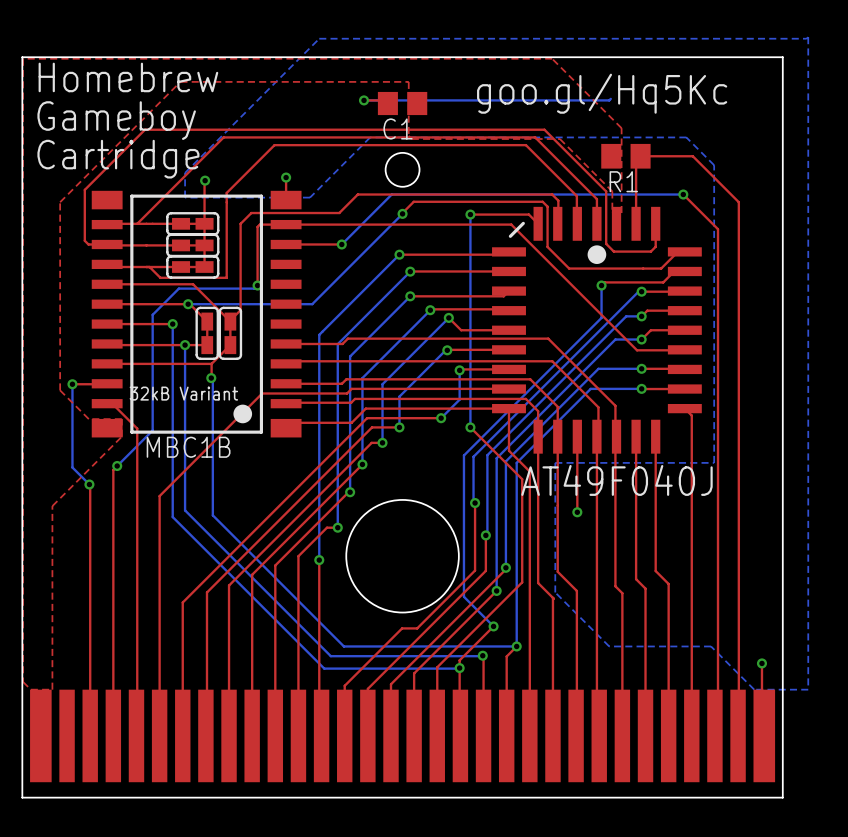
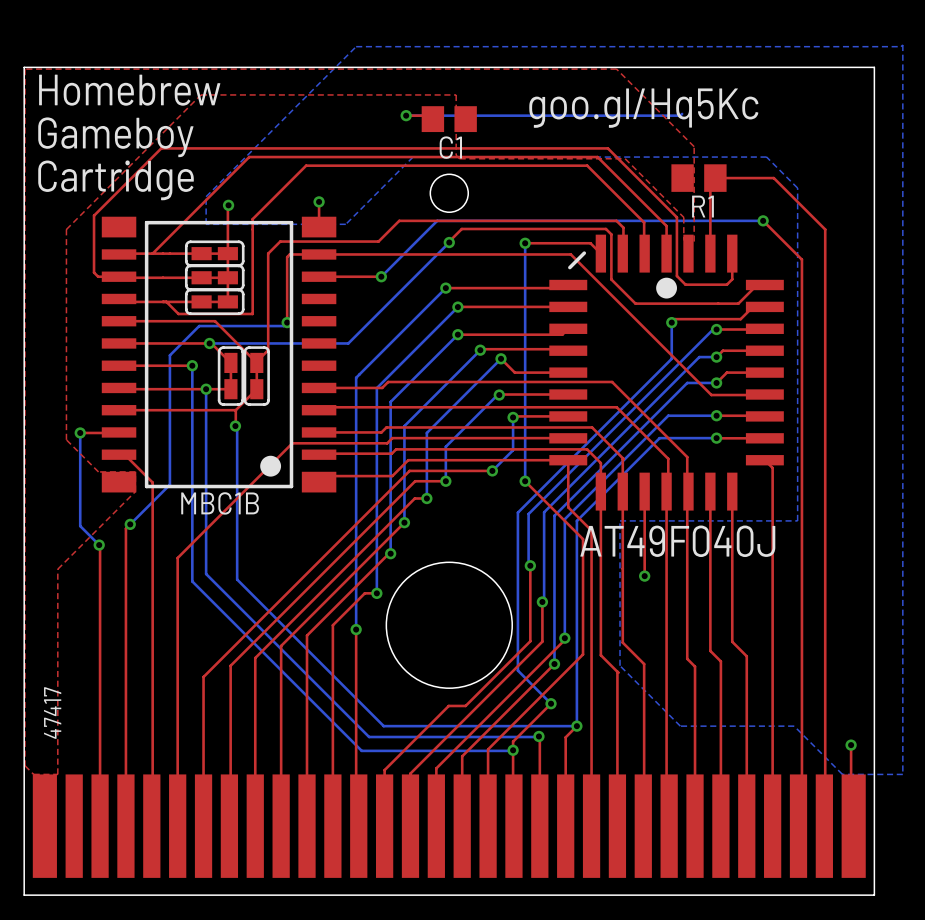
text: 32kB Variant (183, 393) -> none
text: none -> 47417 (52, 713)

